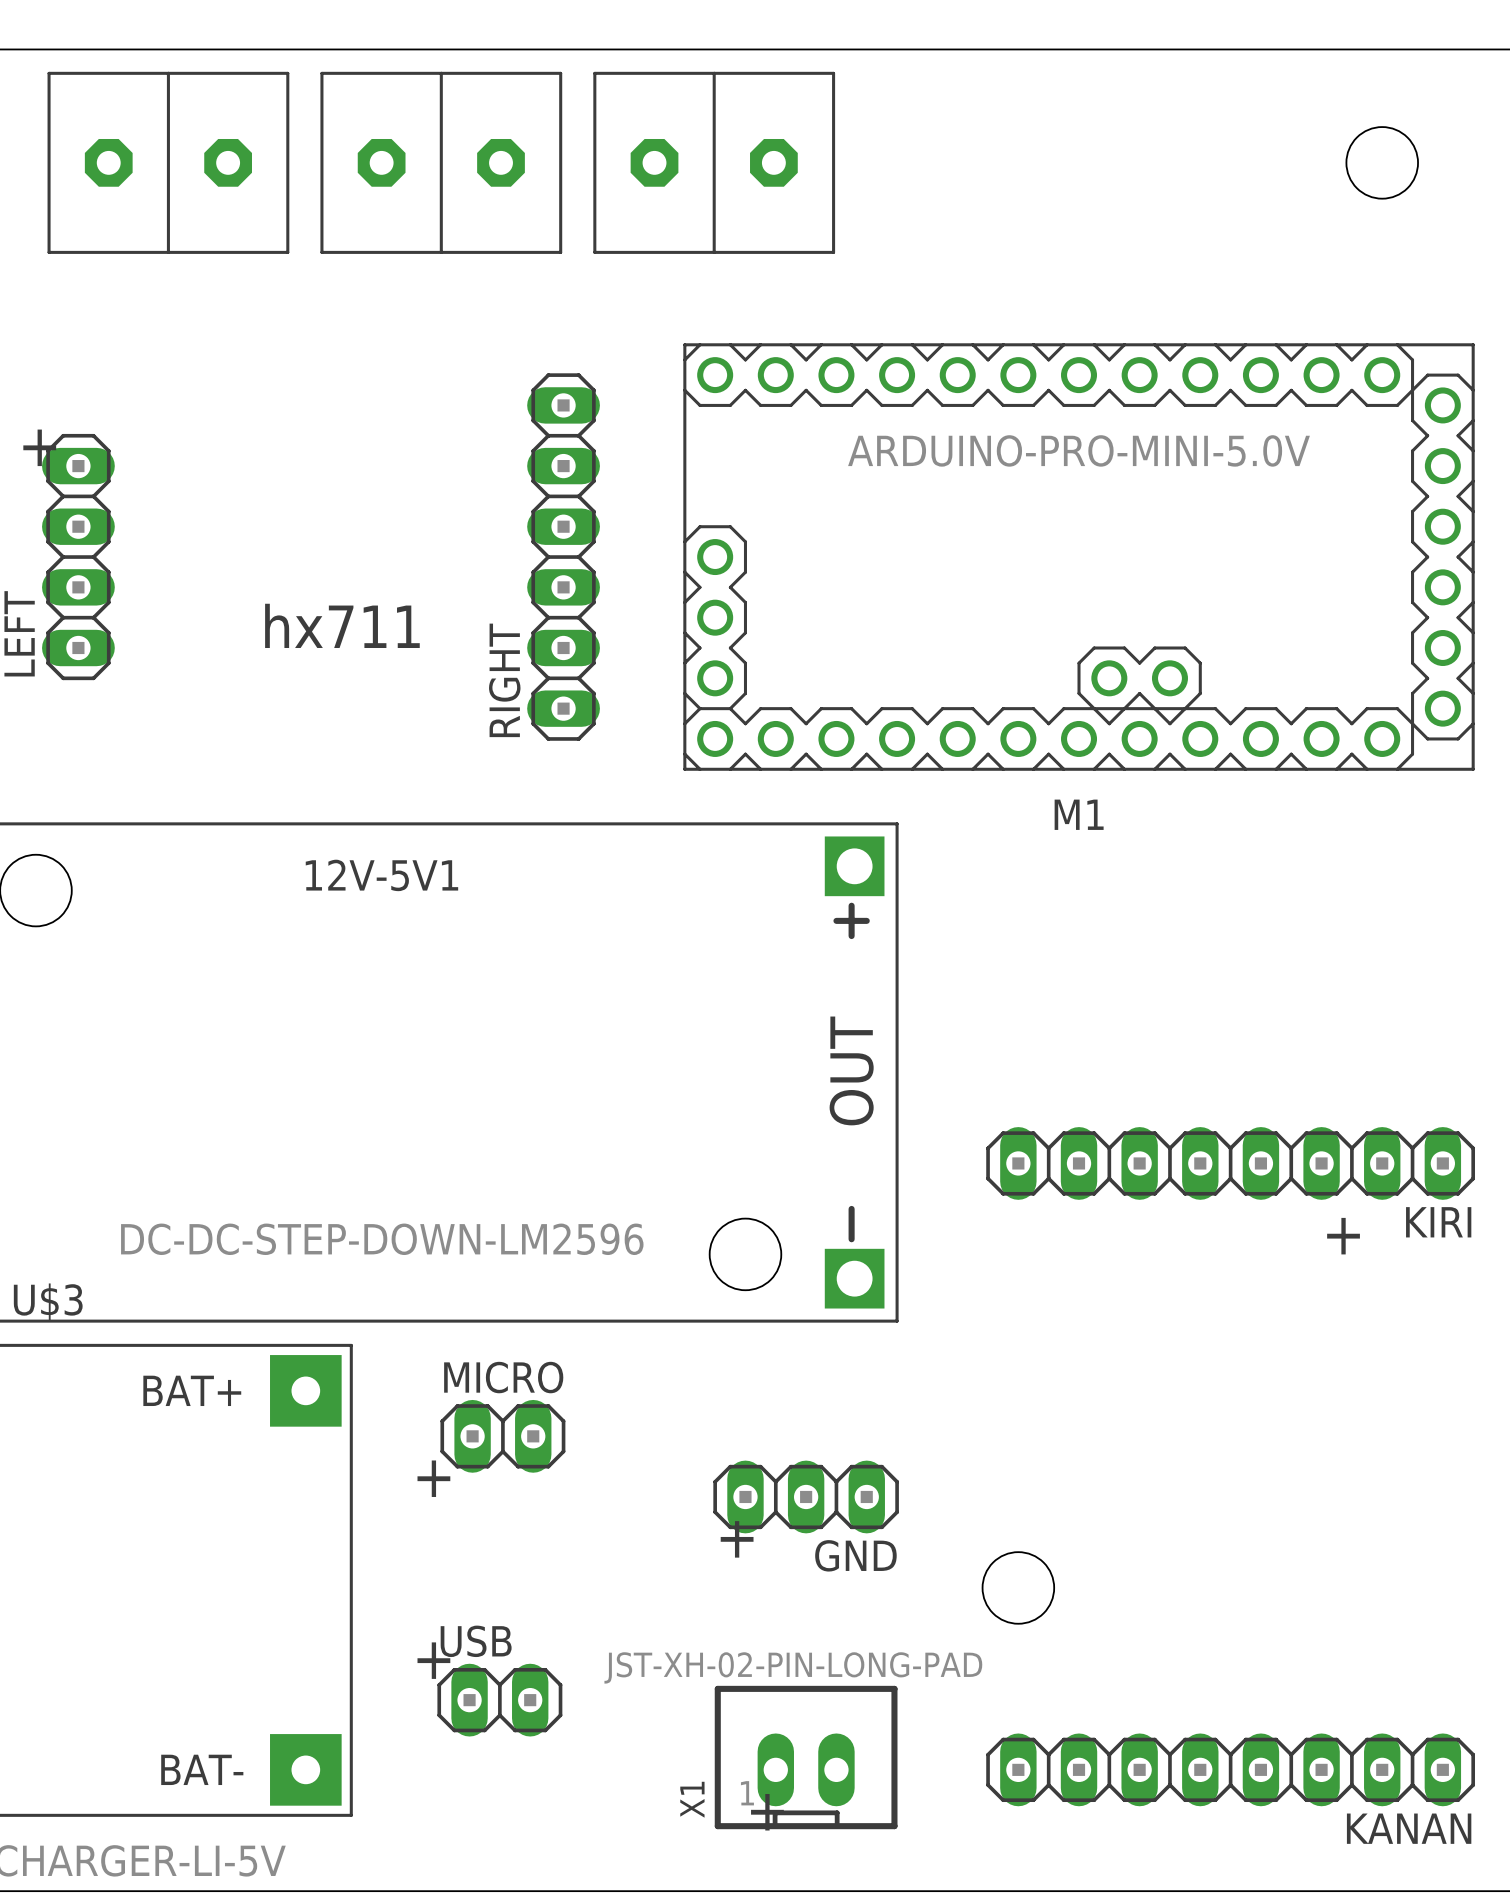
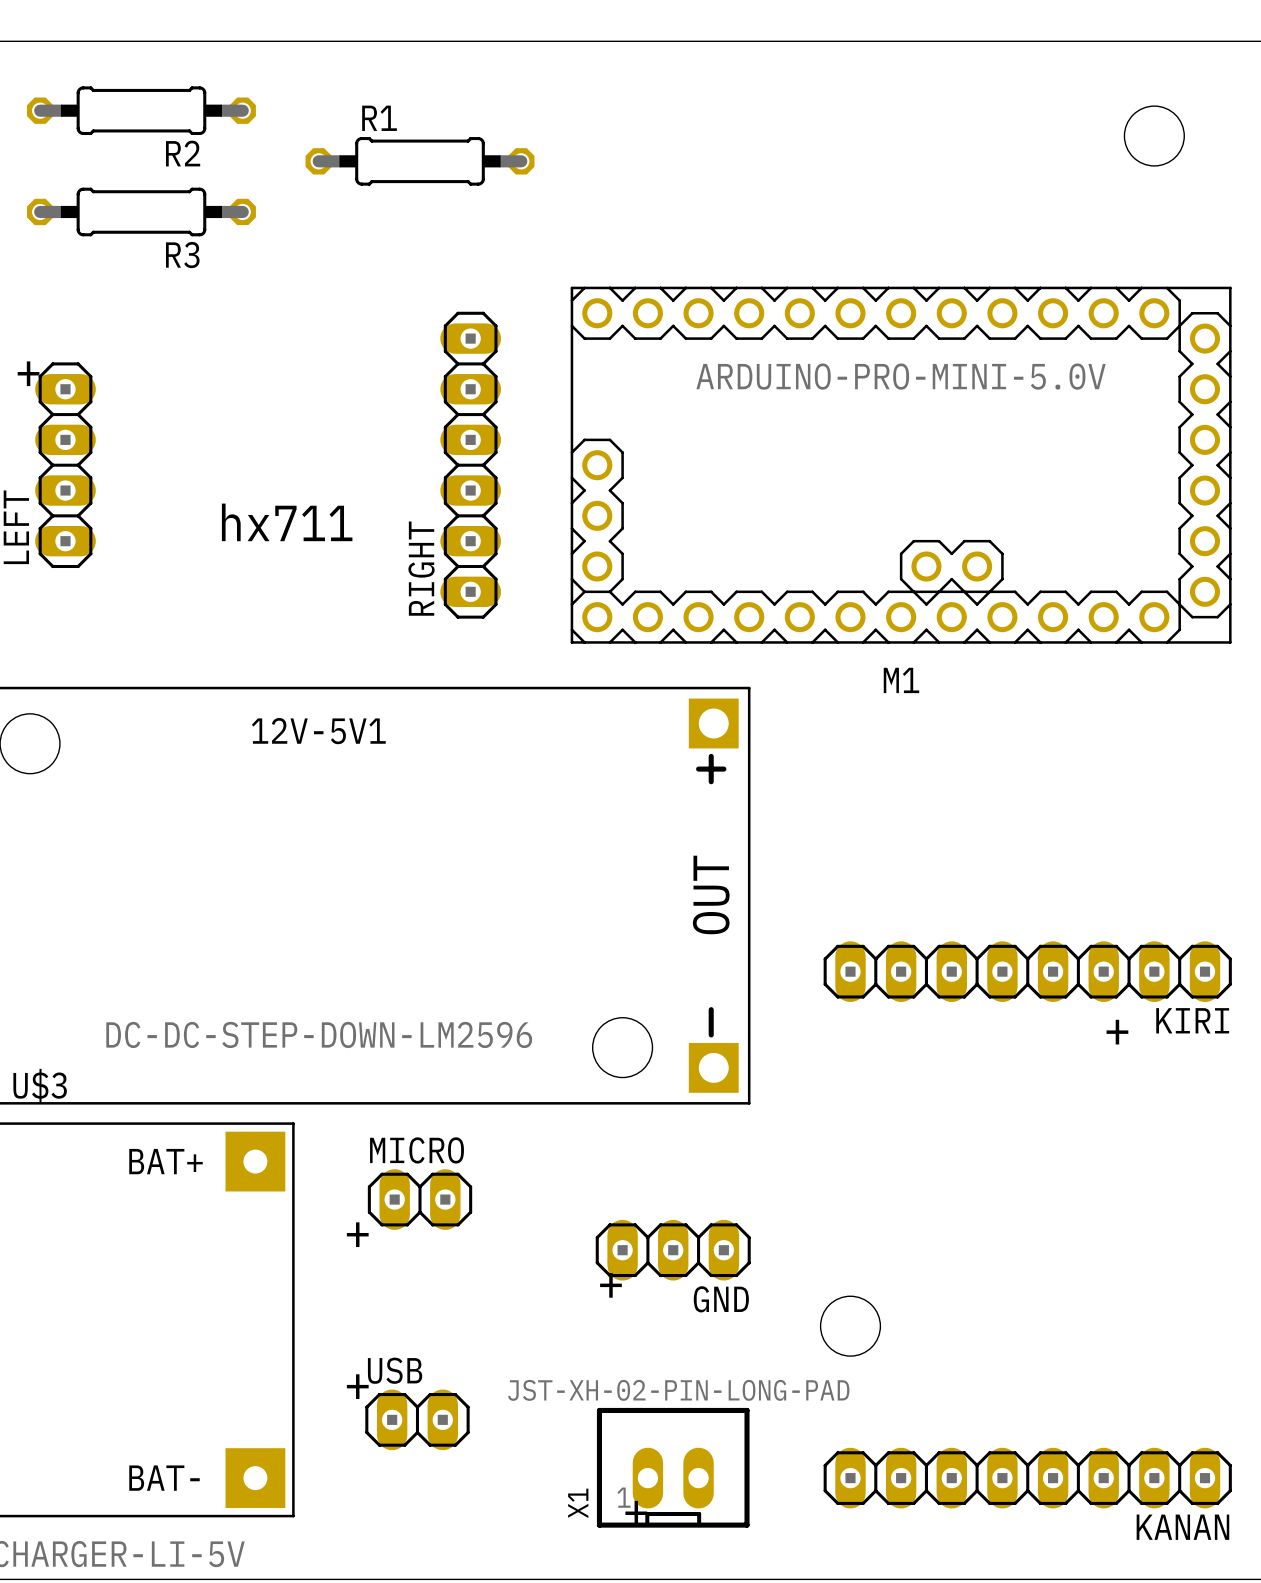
R2: none -> (141, 110)
part: (168, 162) -> none
part: (441, 162) -> none
part: (714, 162) -> none
R1: none -> (420, 161)
R3: none -> (141, 211)

